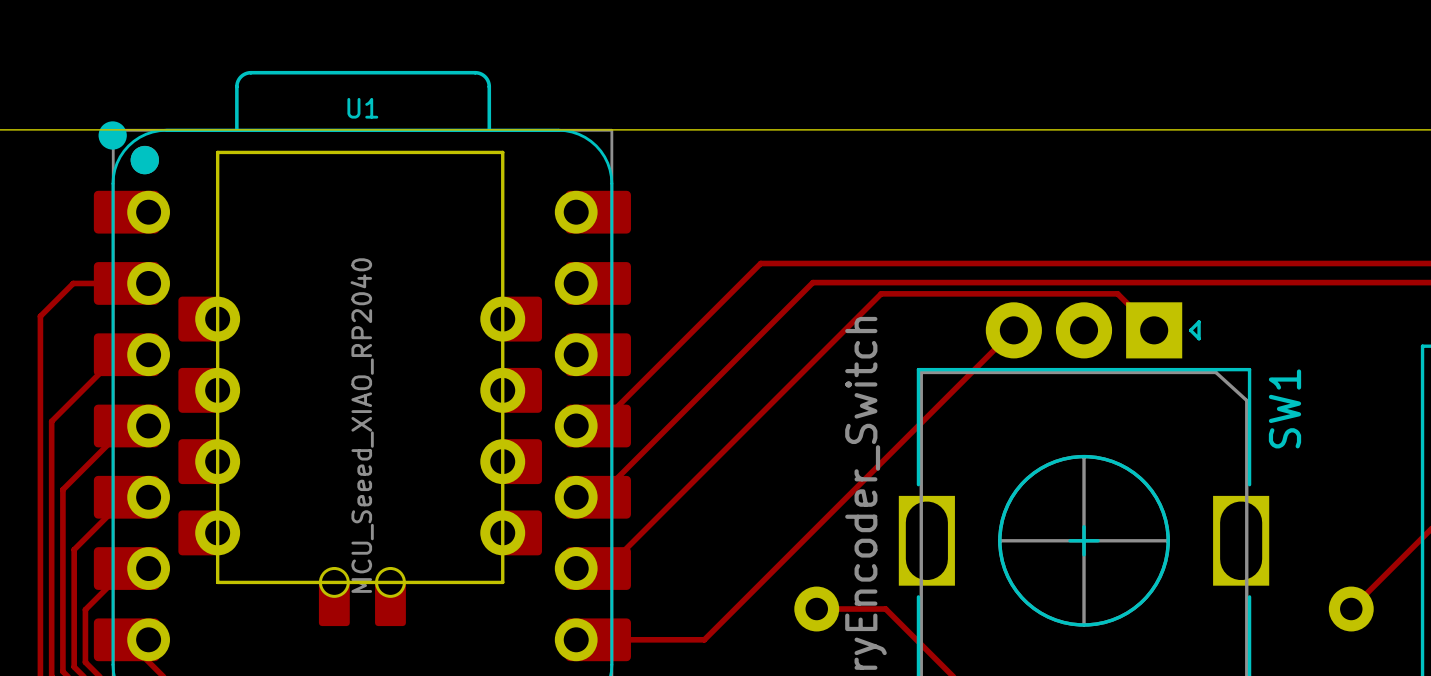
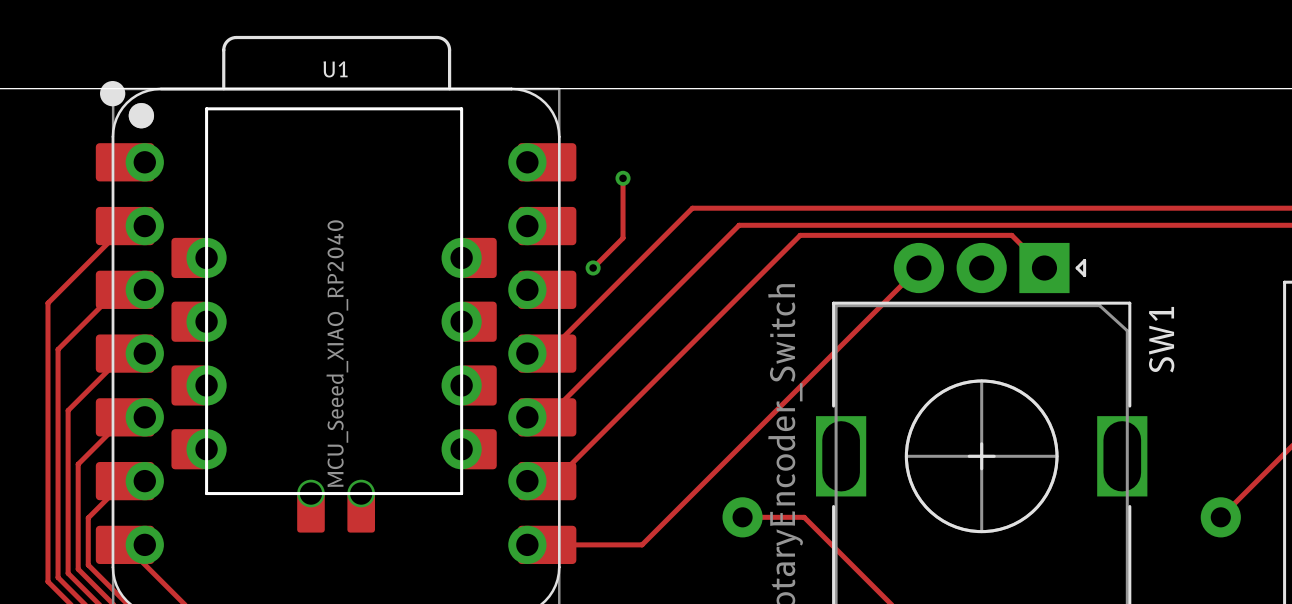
track: none -> (623, 178) (623, 238) (593, 267)
via: none -> (623, 178)
track: (126, 283) (73, 283) (40, 316) (40, 369) -> (125, 226) (47, 303)
via: none -> (593, 267)

